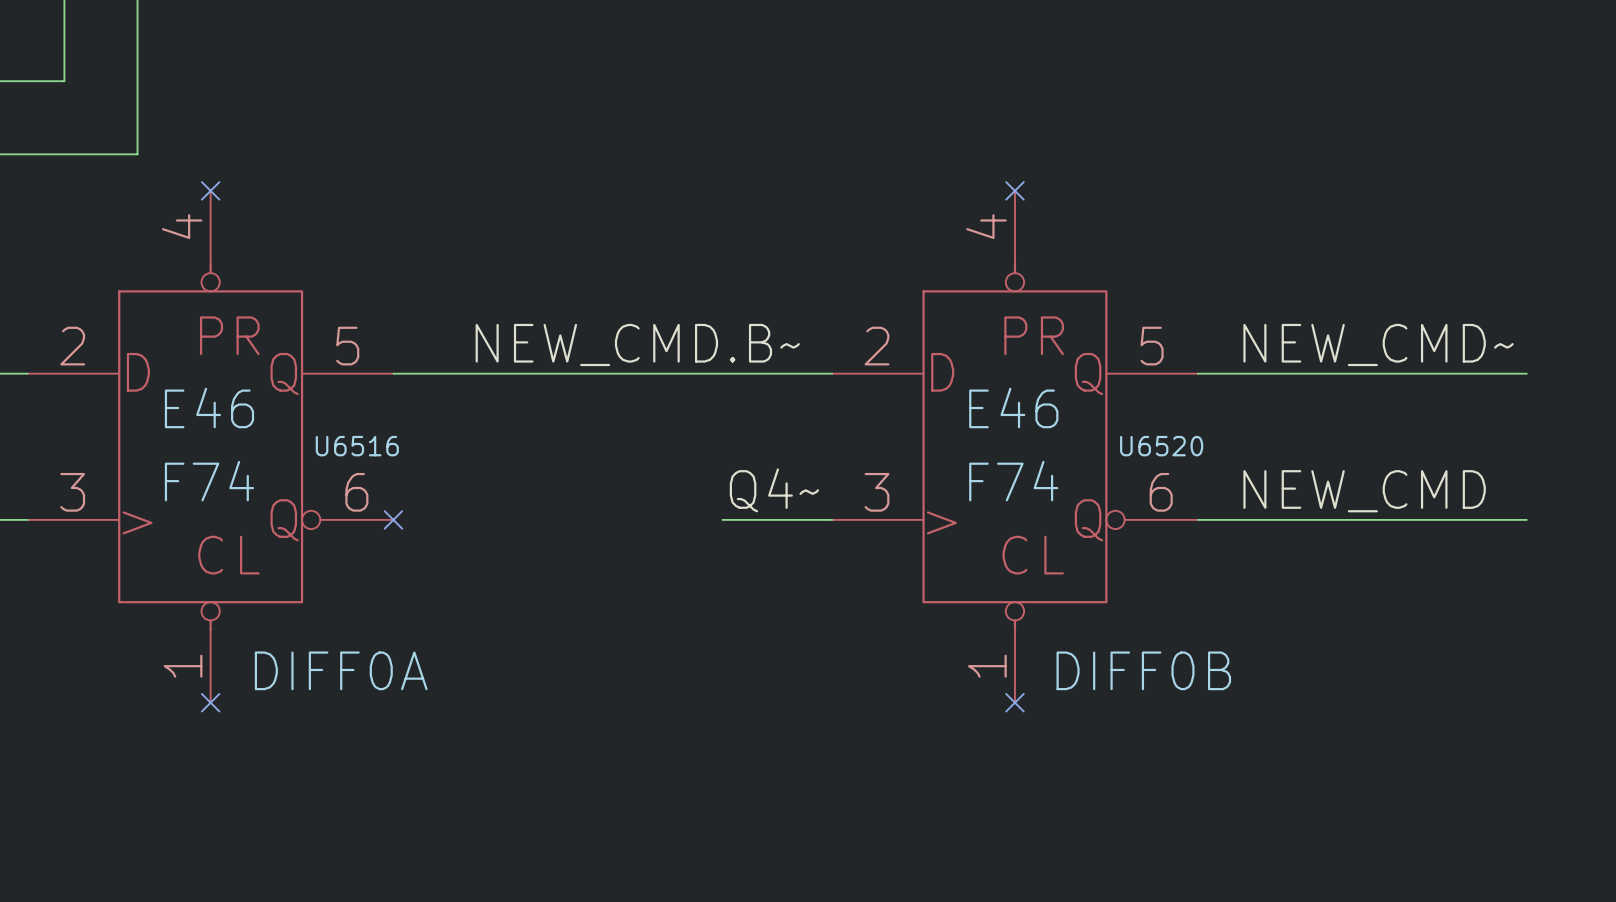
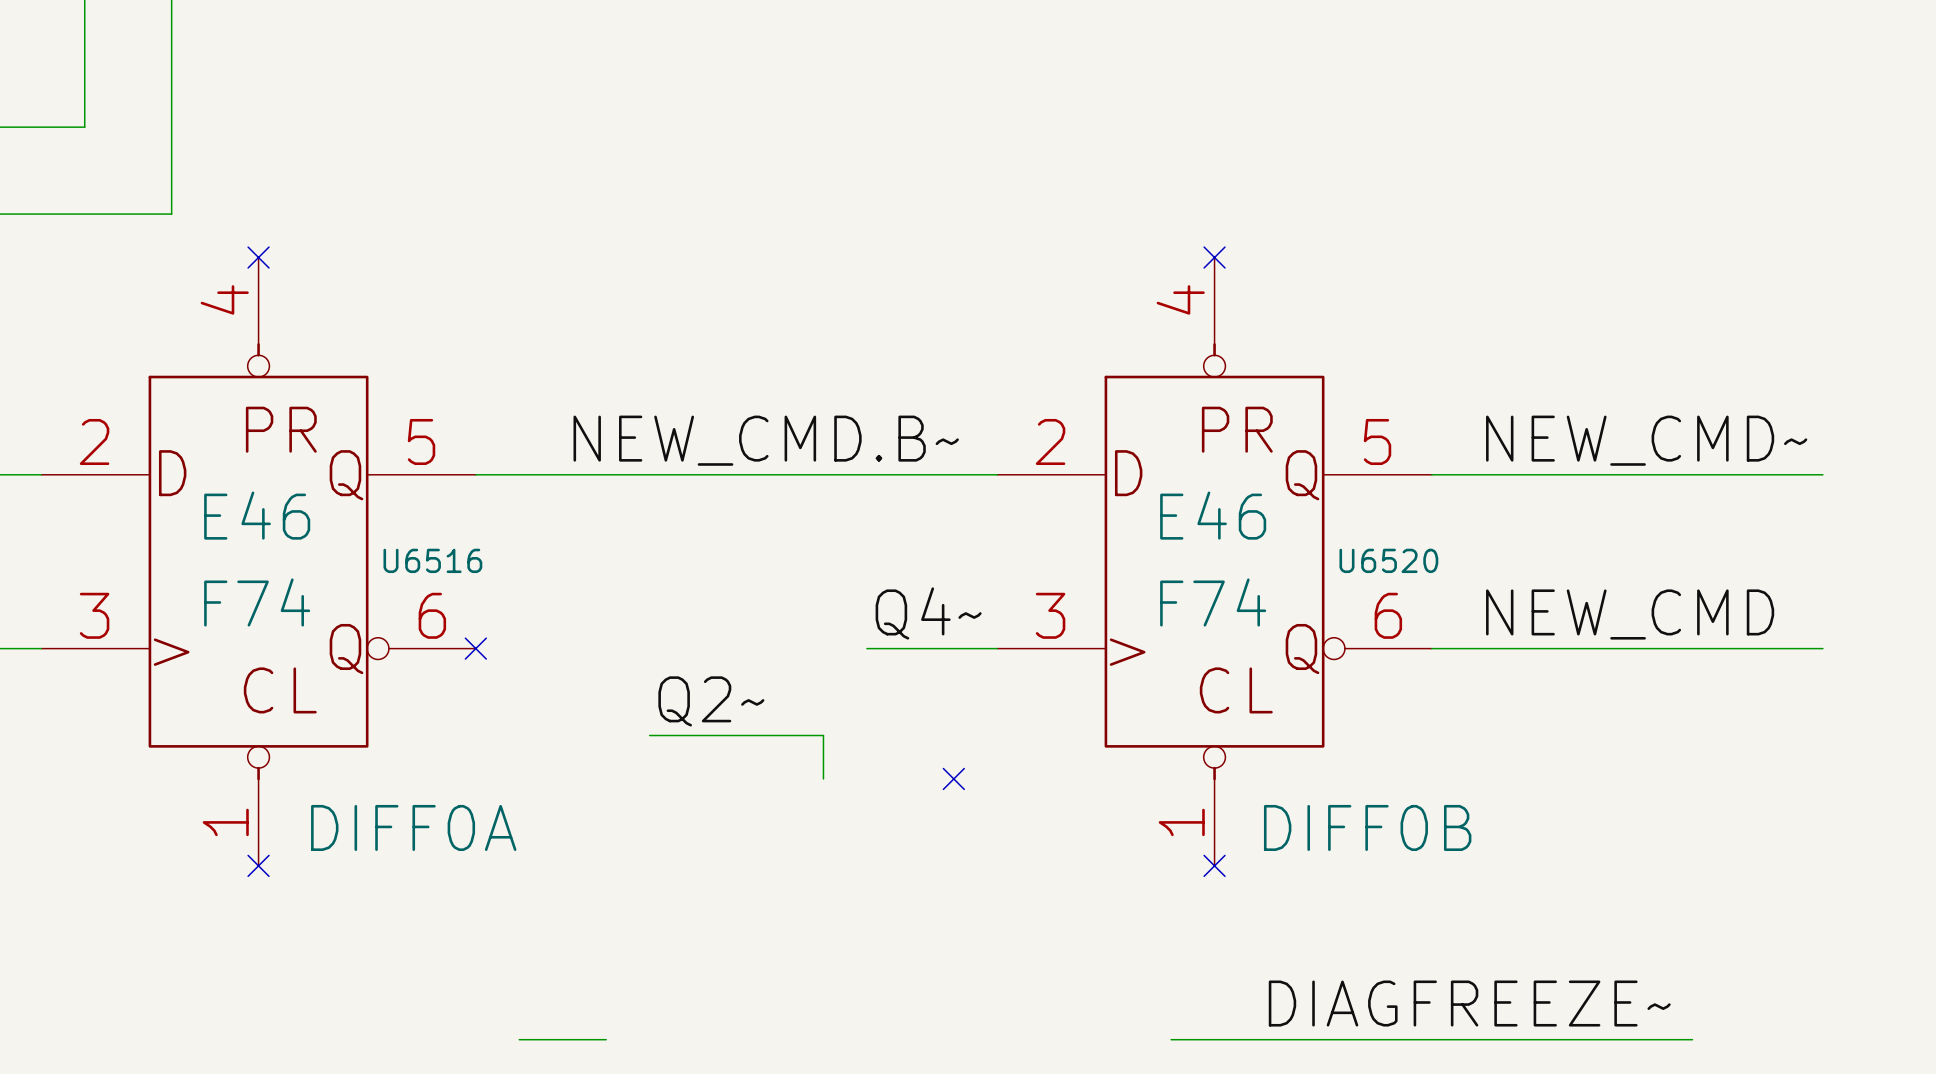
label: none -> Q2~ (711, 701)
wire: none -> (649, 735) (823, 735) (823, 778)
no-connect mark: none -> (953, 778)
label: none -> DIAGFREEZE~ (1469, 1003)
wire: none -> (519, 1039) (606, 1039)
wire: none -> (1171, 1039) (1692, 1039)

